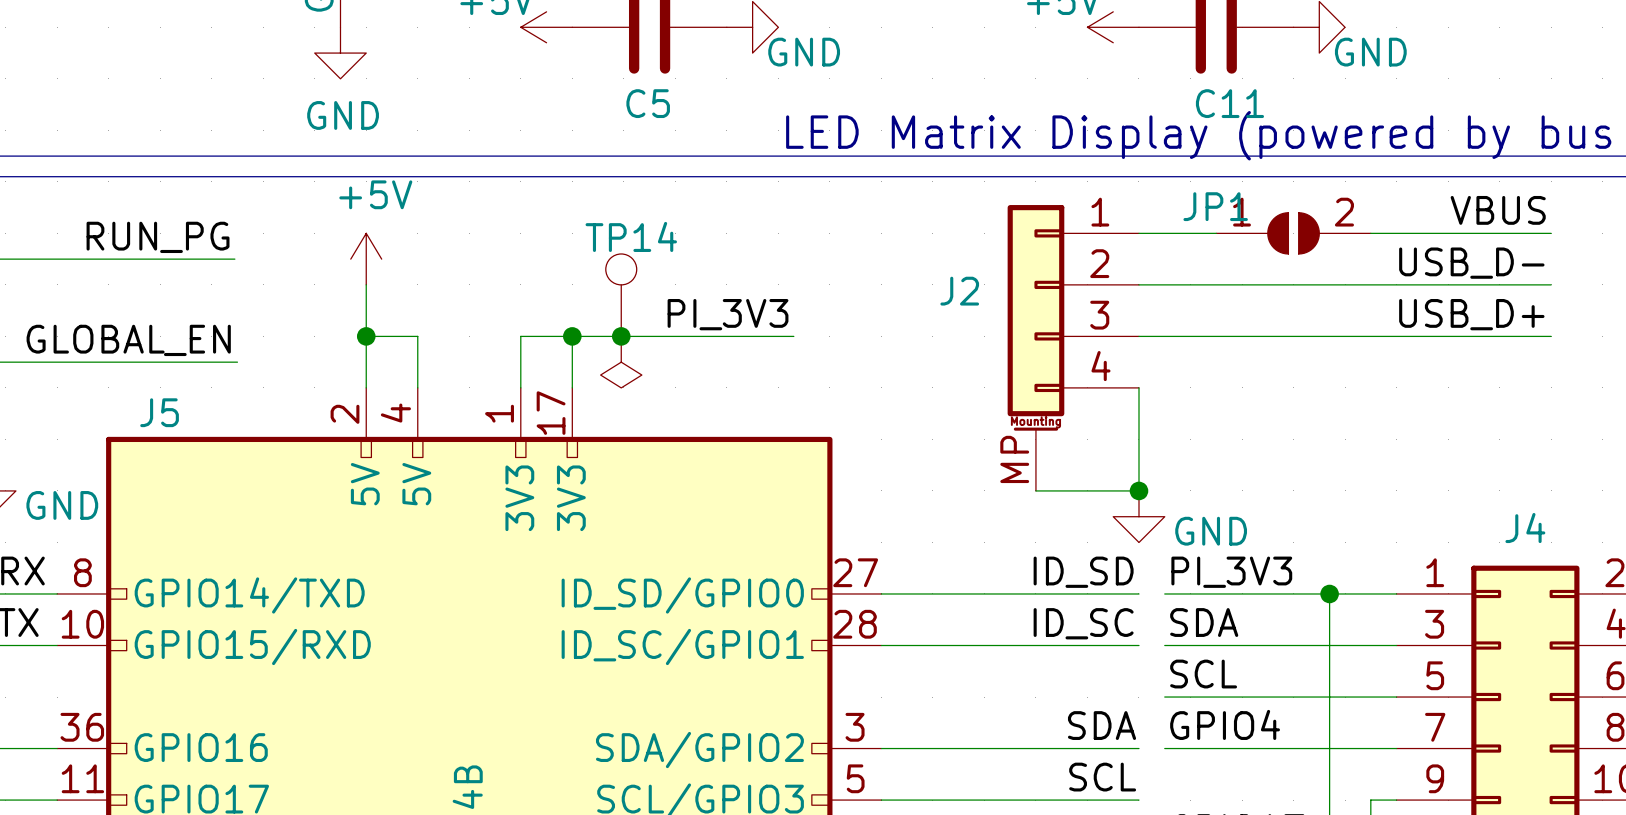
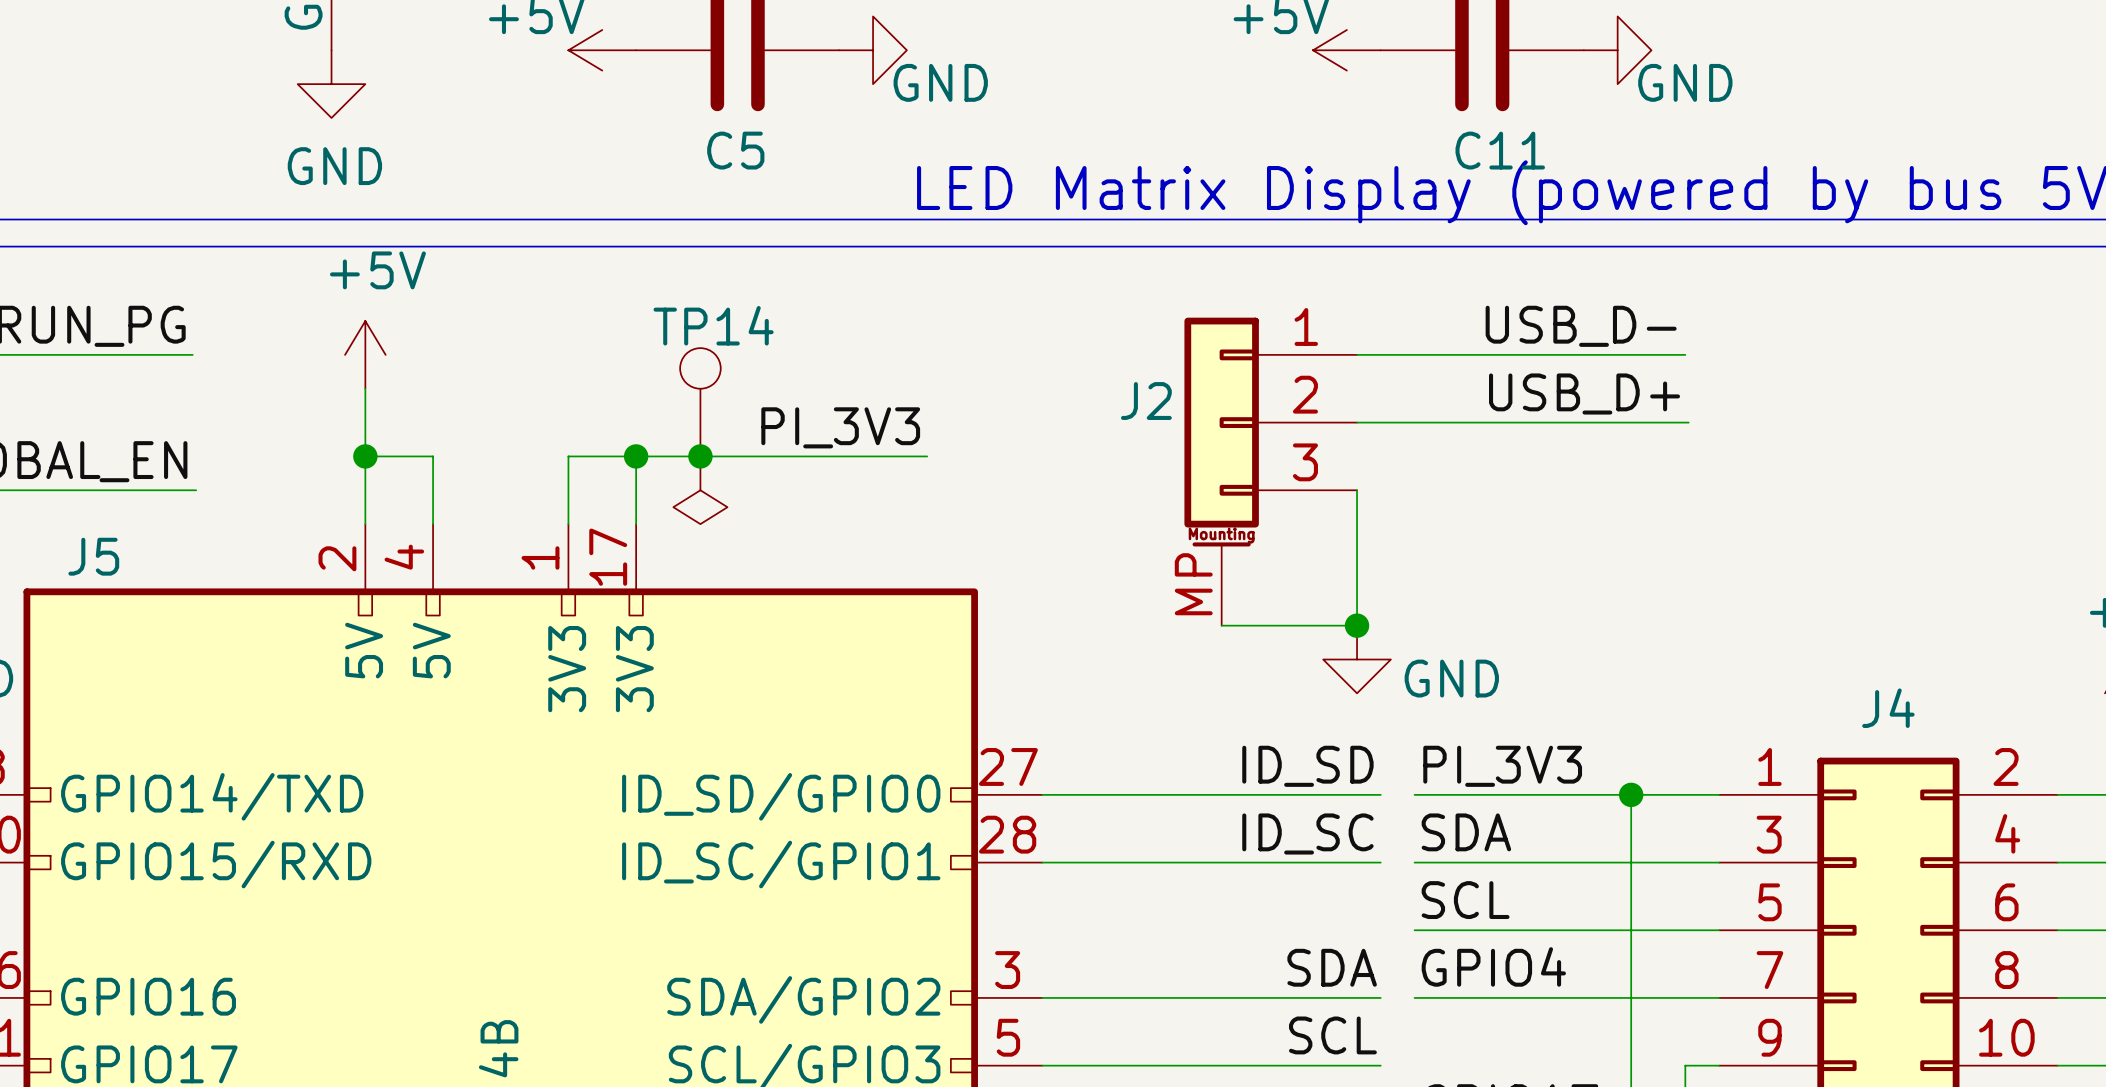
J2 symbol: [1007, 205, 1139, 491] -> [1184, 317, 1358, 626]
label: VBUS (1498, 210) -> none
wire: (1138, 233) (1216, 233) -> none
JP1: (1293, 233) -> none
wire: (1370, 233) (1551, 233) -> none
wire: none -> (1357, 354) (1685, 354)
label position: USB_D- (1471, 263) -> USB_D- (1581, 326)
wire: (1138, 284) (1551, 284) -> none
wire: none -> (1357, 422) (1688, 422)
label position: USB_D+ (1471, 314) -> USB_D+ (1584, 394)
wire: (1138, 336) (1551, 336) -> none
wire: (1138, 387) (1138, 490) (1035, 490) -> (1357, 490) (1357, 625) (1221, 625)
junction position: (1138, 490) -> (1357, 625)
power symbol position: GND (1138, 516) -> GND (1357, 659)

